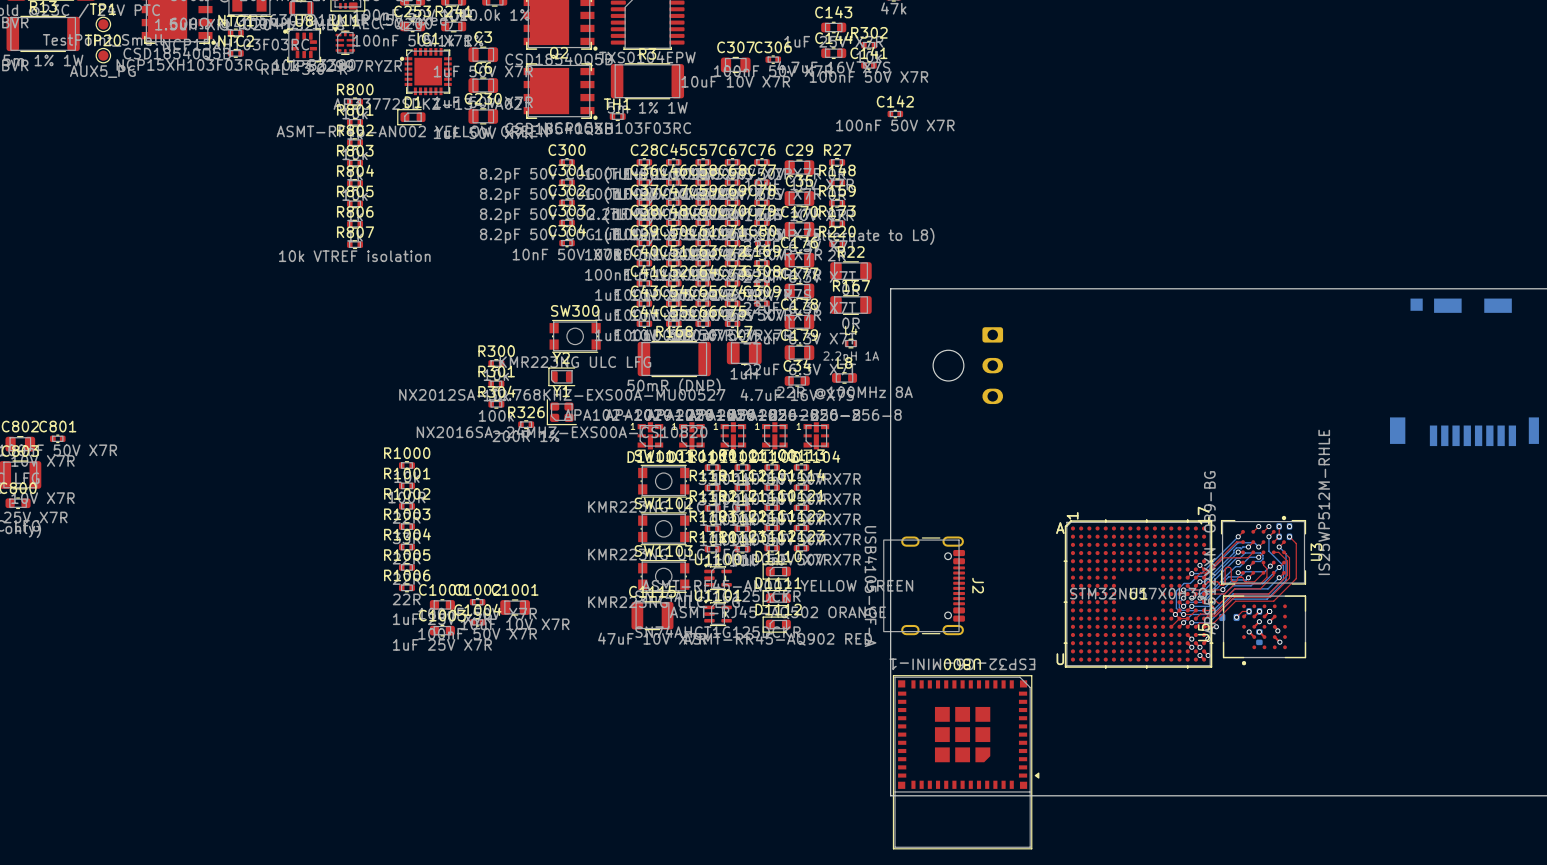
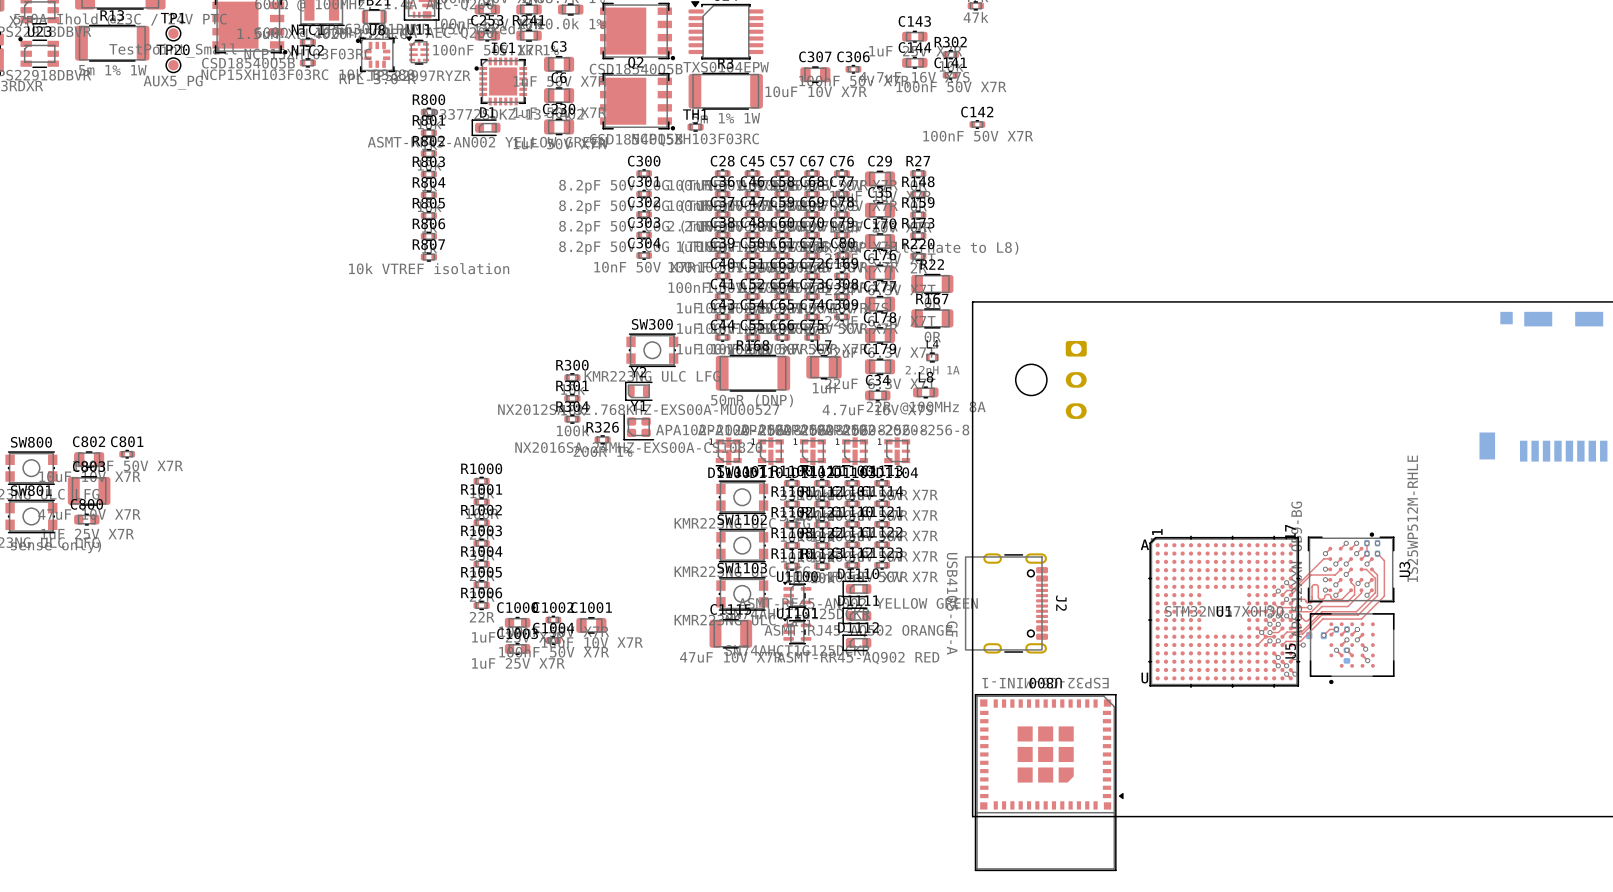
bottom track: (1238, 536) (1201, 573) (1191, 573) -> none
bottom track: (1268, 536) (1268, 551) (1283, 565) (1283, 579) (1268, 594) (1233, 594) (1212, 614) (1191, 614) (1183, 622) -> none
bottom track: (1248, 547) (1236, 547) (1233, 552) (1205, 581) (1199, 581) -> none
bottom track: (1258, 547) (1254, 542) (1238, 542) (1204, 576) (1197, 576) (1190, 583) (1184, 583) (1176, 591) (1176, 608) (1183, 614) -> none
bottom track: (1279, 547) (1286, 553) (1286, 580) (1267, 599) (1232, 599) (1208, 622) (1191, 622) -> none
bottom track: (1238, 552) (1200, 589) (1183, 589) -> none
bottom track: (1258, 557) (1249, 557) (1239, 566) (1235, 566) (1204, 598) (1200, 598) -> none
bottom track: (1270, 566) (1264, 571) (1245, 571) (1239, 576) (1228, 576) (1203, 602) (1193, 602) -> none
bottom track: (1248, 567) (1254, 561) (1260, 561) (1262, 555) (1260, 552) (1245, 552) (1239, 558) (1236, 558) (1200, 593) (1196, 593) (1191, 598) -> none
bottom track: (1279, 567) (1262, 583) (1232, 585) (1209, 606) (1191, 606) -> none
bottom track: (1248, 577) (1246, 580) (1232, 580) (1222, 589) -> none
bottom track: (1279, 577) (1268, 588) (1234, 588) (1213, 610) (1181, 610) (1179, 607) (1179, 602) (1183, 598) -> none
bottom track: (1193, 602) (1187, 602) (1183, 606) -> none

